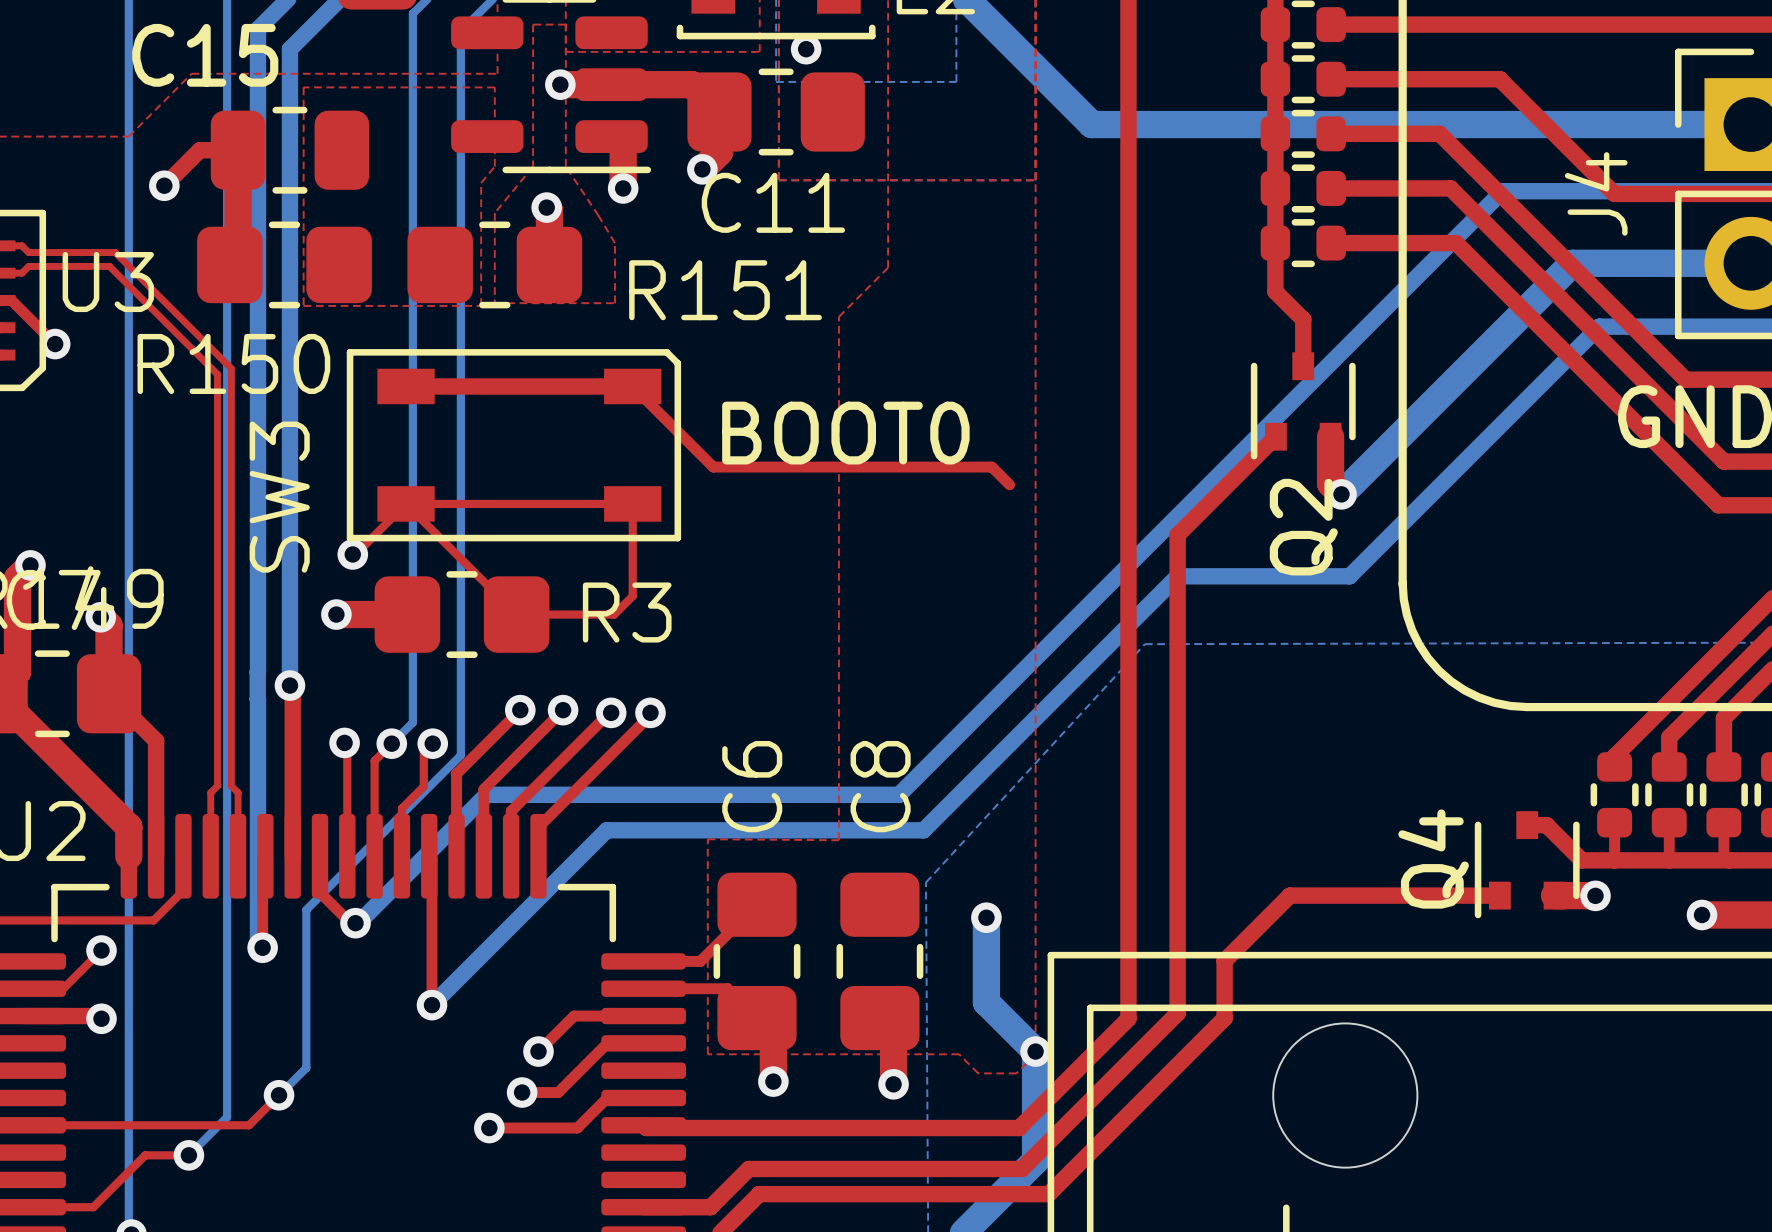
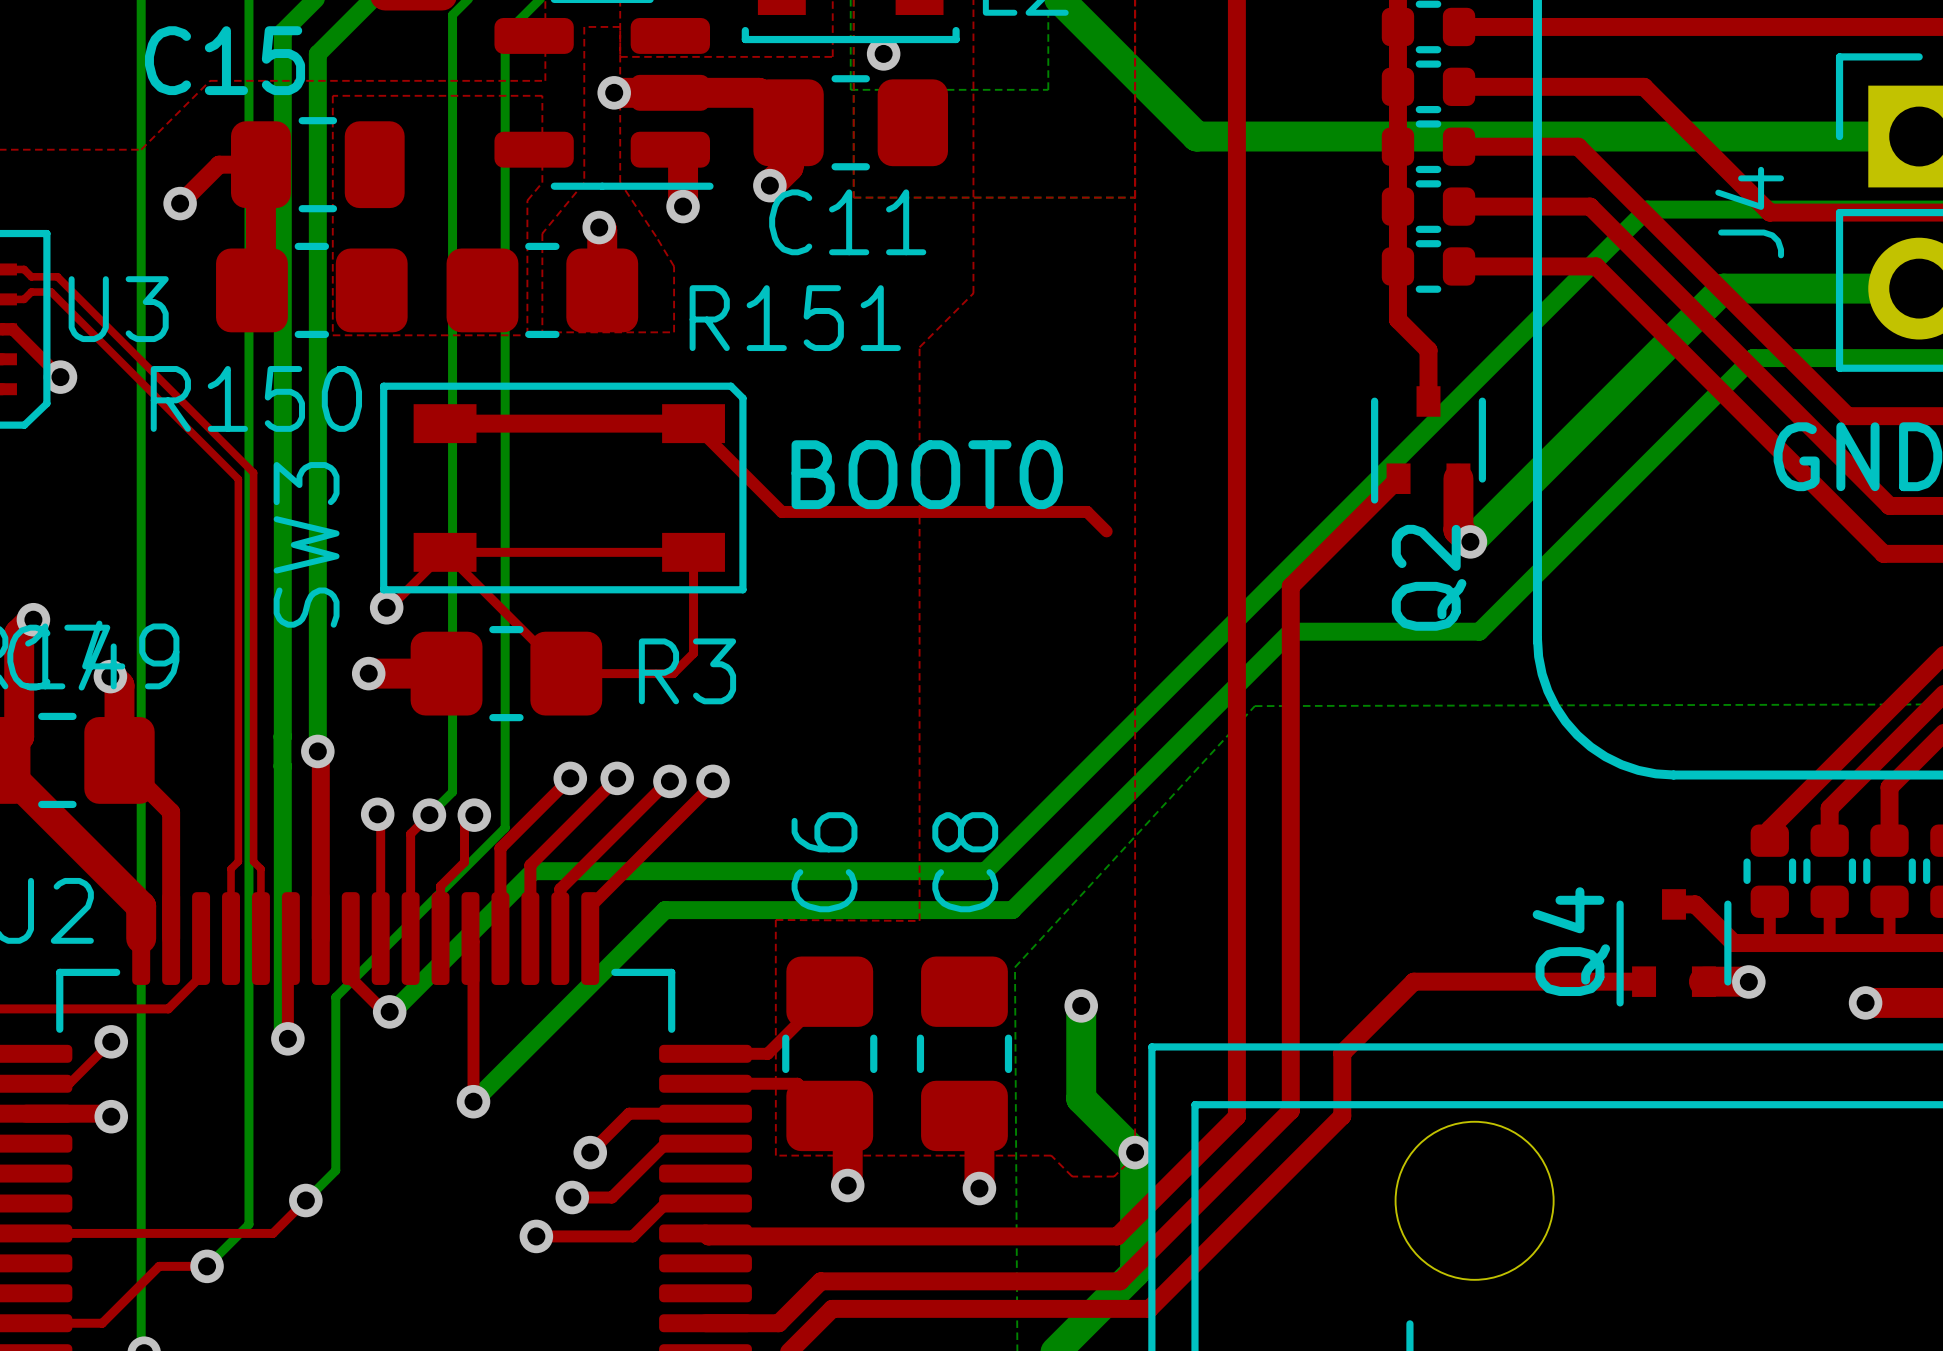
top track: (52, 252) (115, 252) (231, 368) (231, 431) -> (57, 276) (253, 472)
top track: (46, 266) (109, 266) (217, 374) (217, 437) -> (51, 292) (238, 479)

